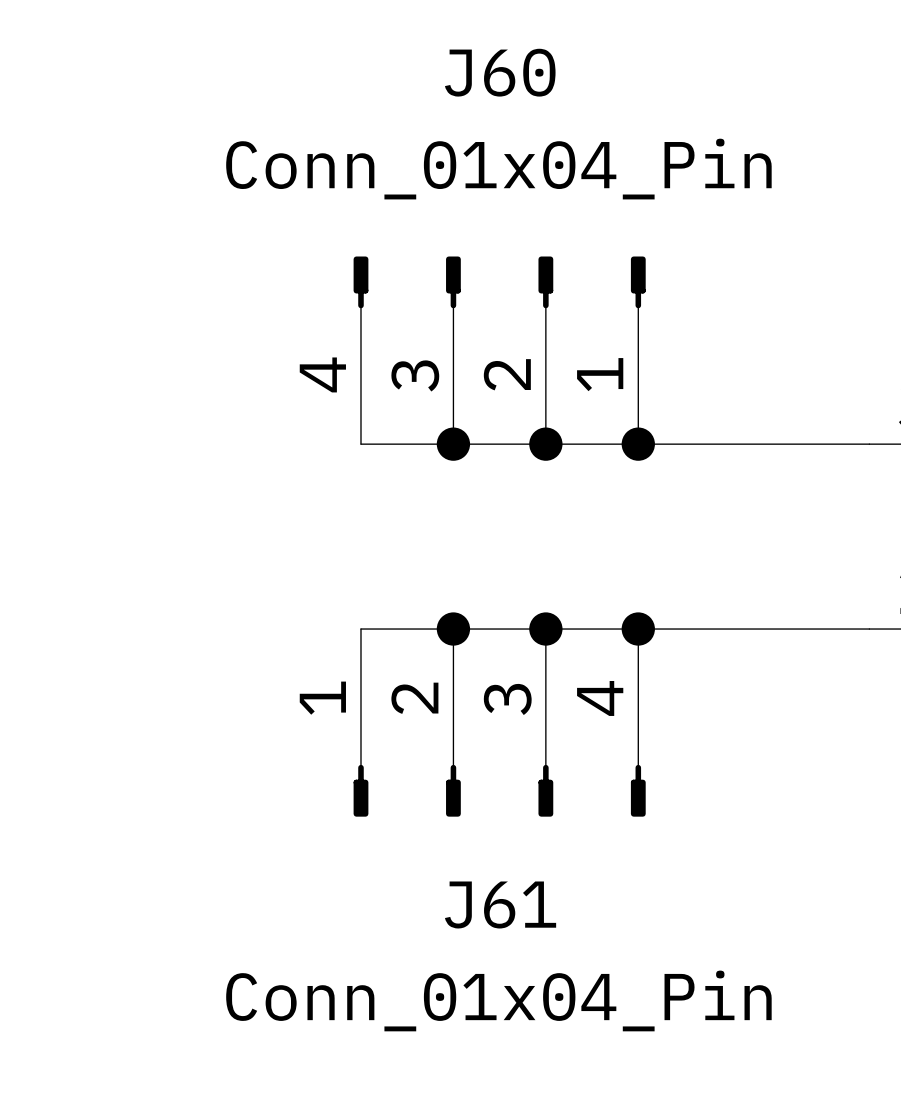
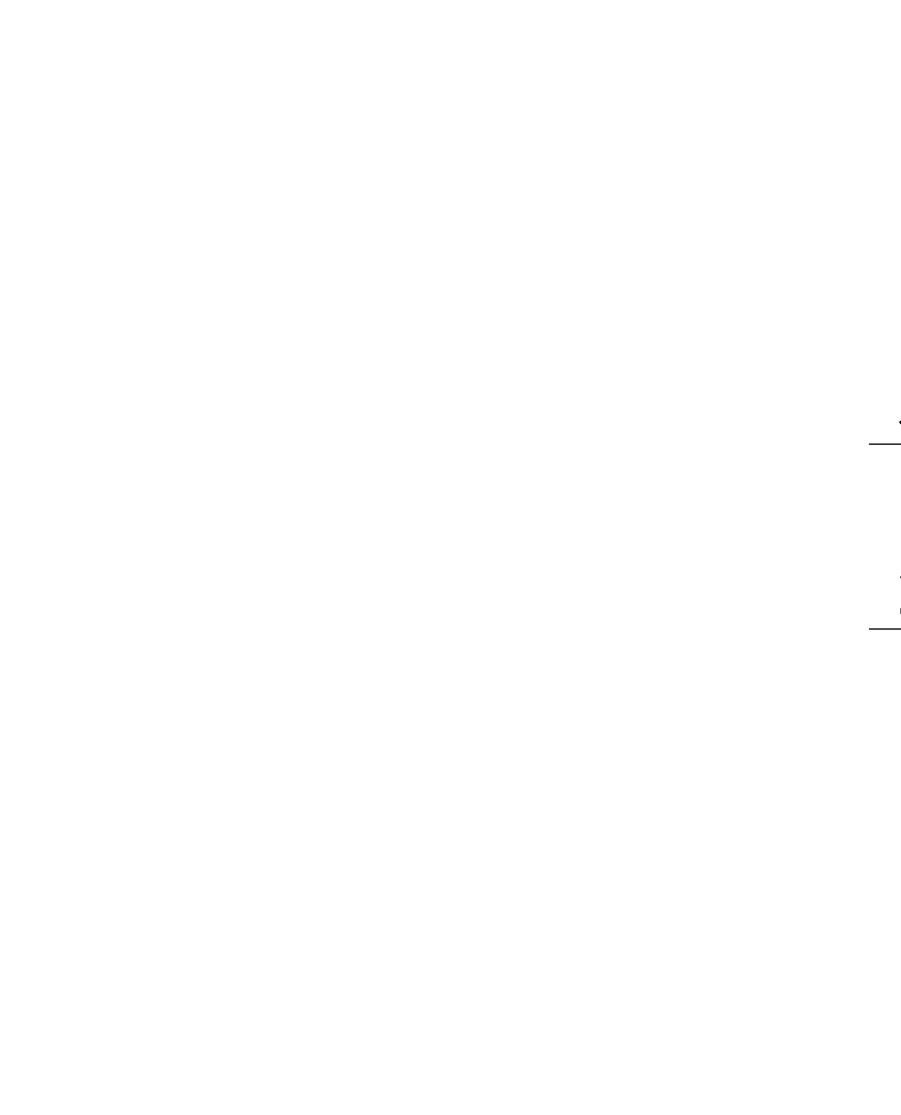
J60: Conn_01x04_Pin (499, 350) -> none
wire: (360, 444) (869, 444) -> none
junction: (453, 444) -> none
junction: (545, 444) -> none
junction: (638, 444) -> none
wire: (360, 629) (869, 629) -> none
junction: (453, 629) -> none
junction: (545, 629) -> none
junction: (638, 629) -> none
J61: Conn_01x04_Pin (499, 722) -> none

